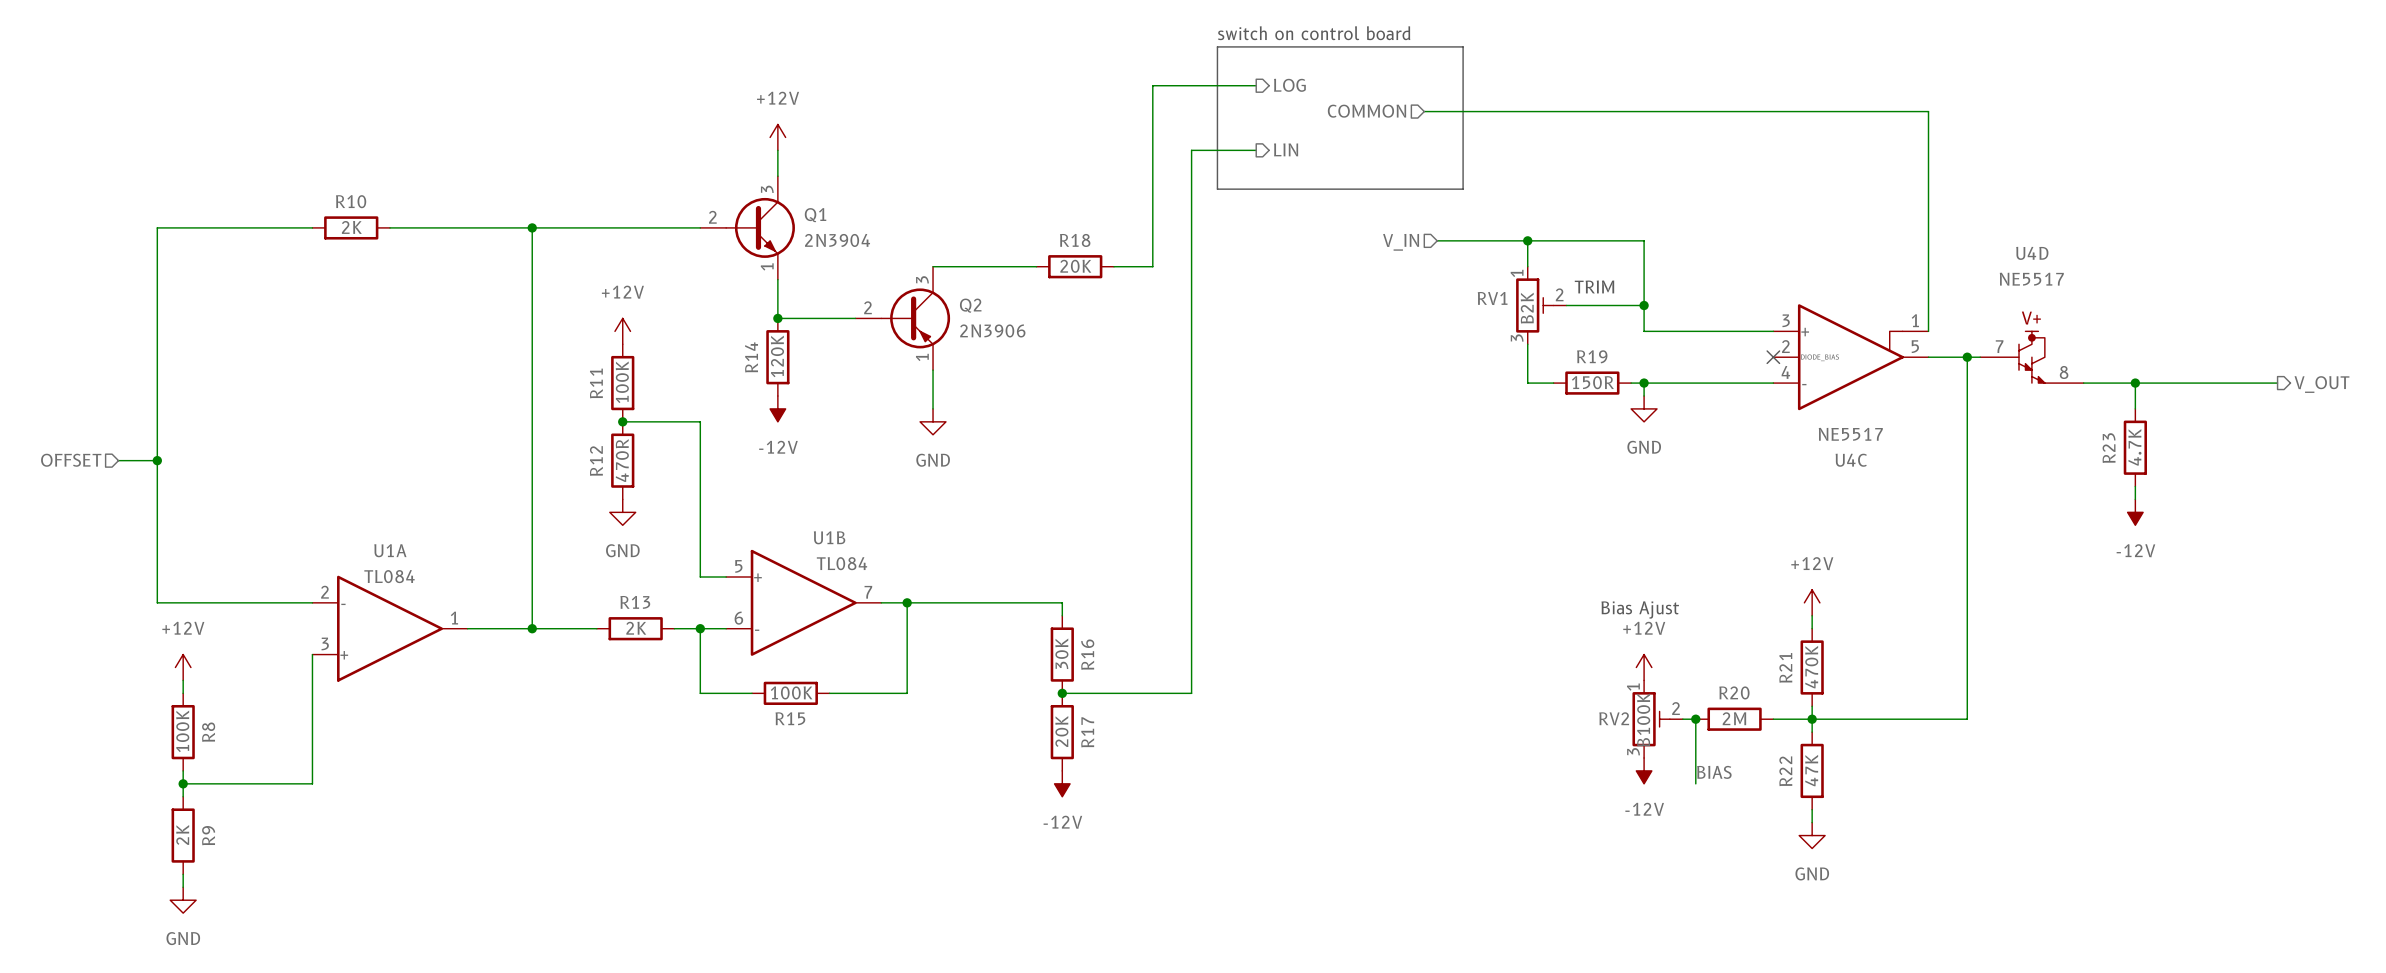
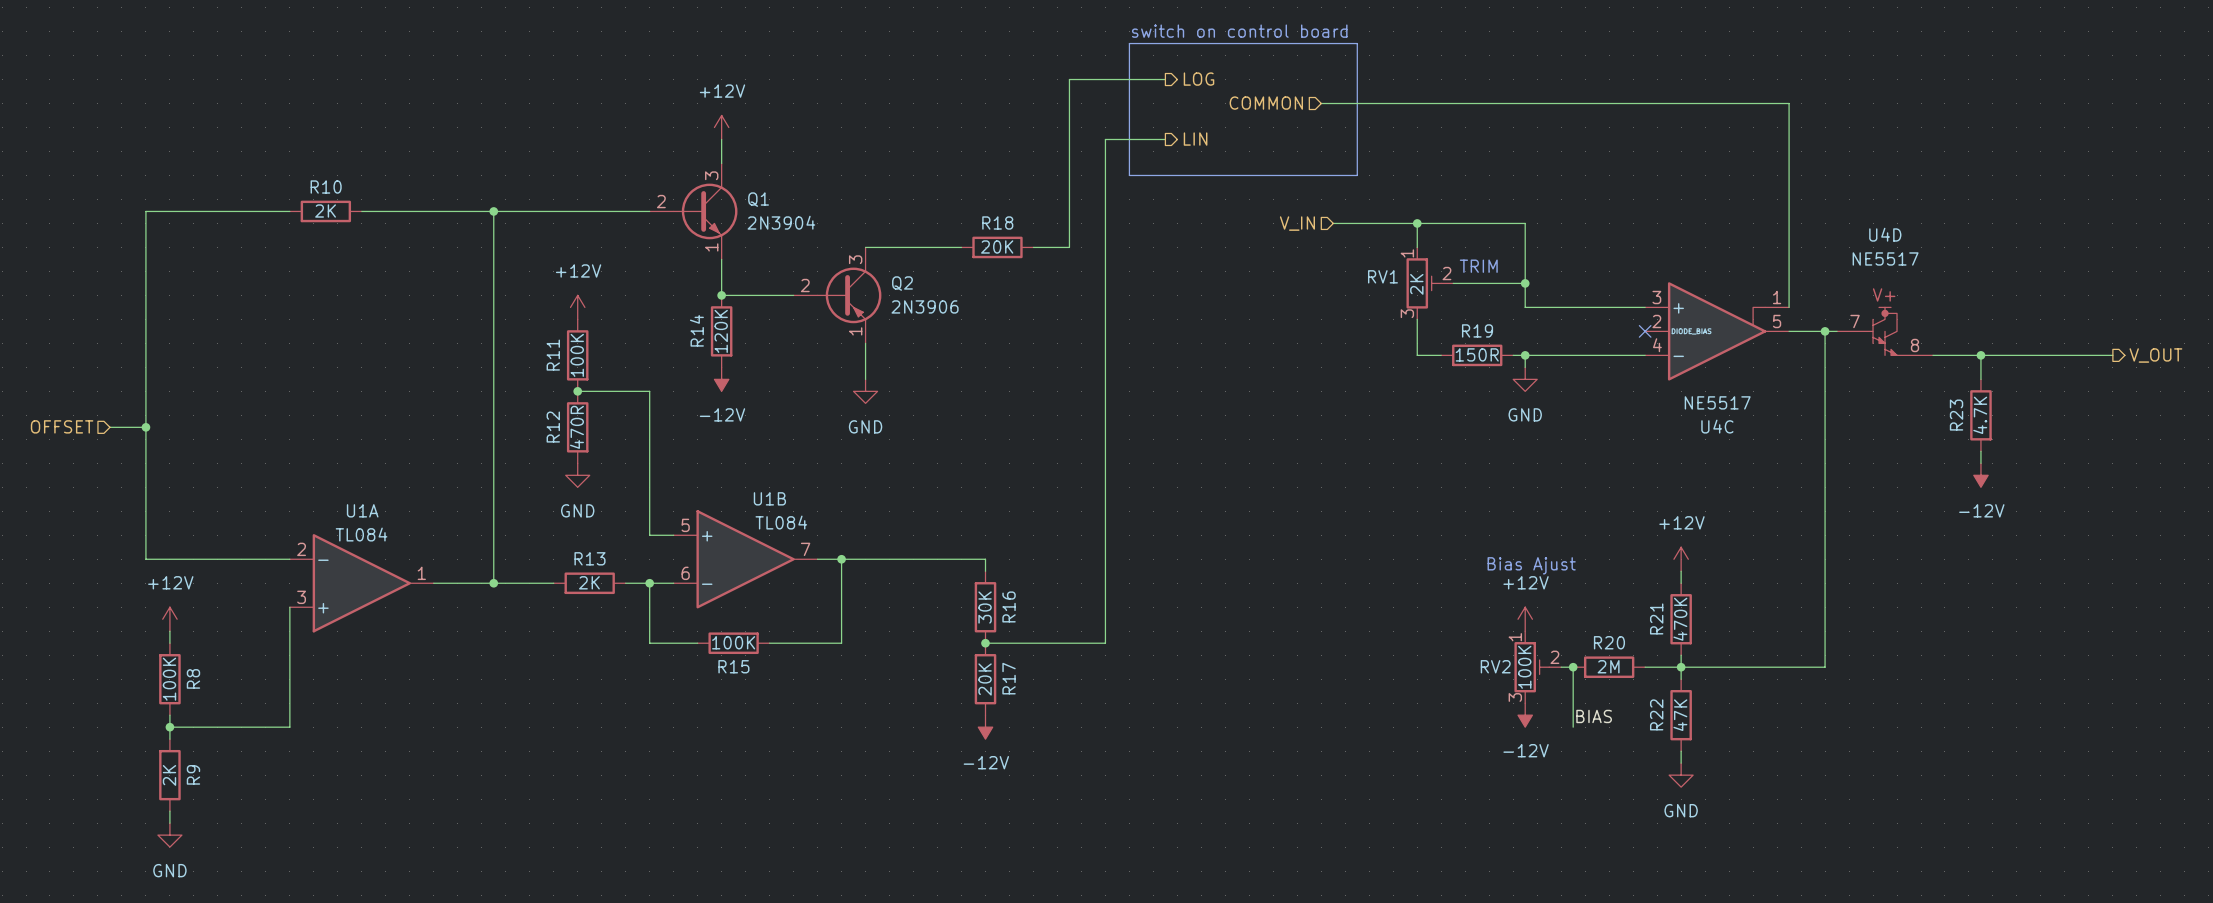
RV1 value: B2K (1527, 308) -> 2K (1416, 284)
RV2 value: B100K (1643, 719) -> 100K (1524, 667)

